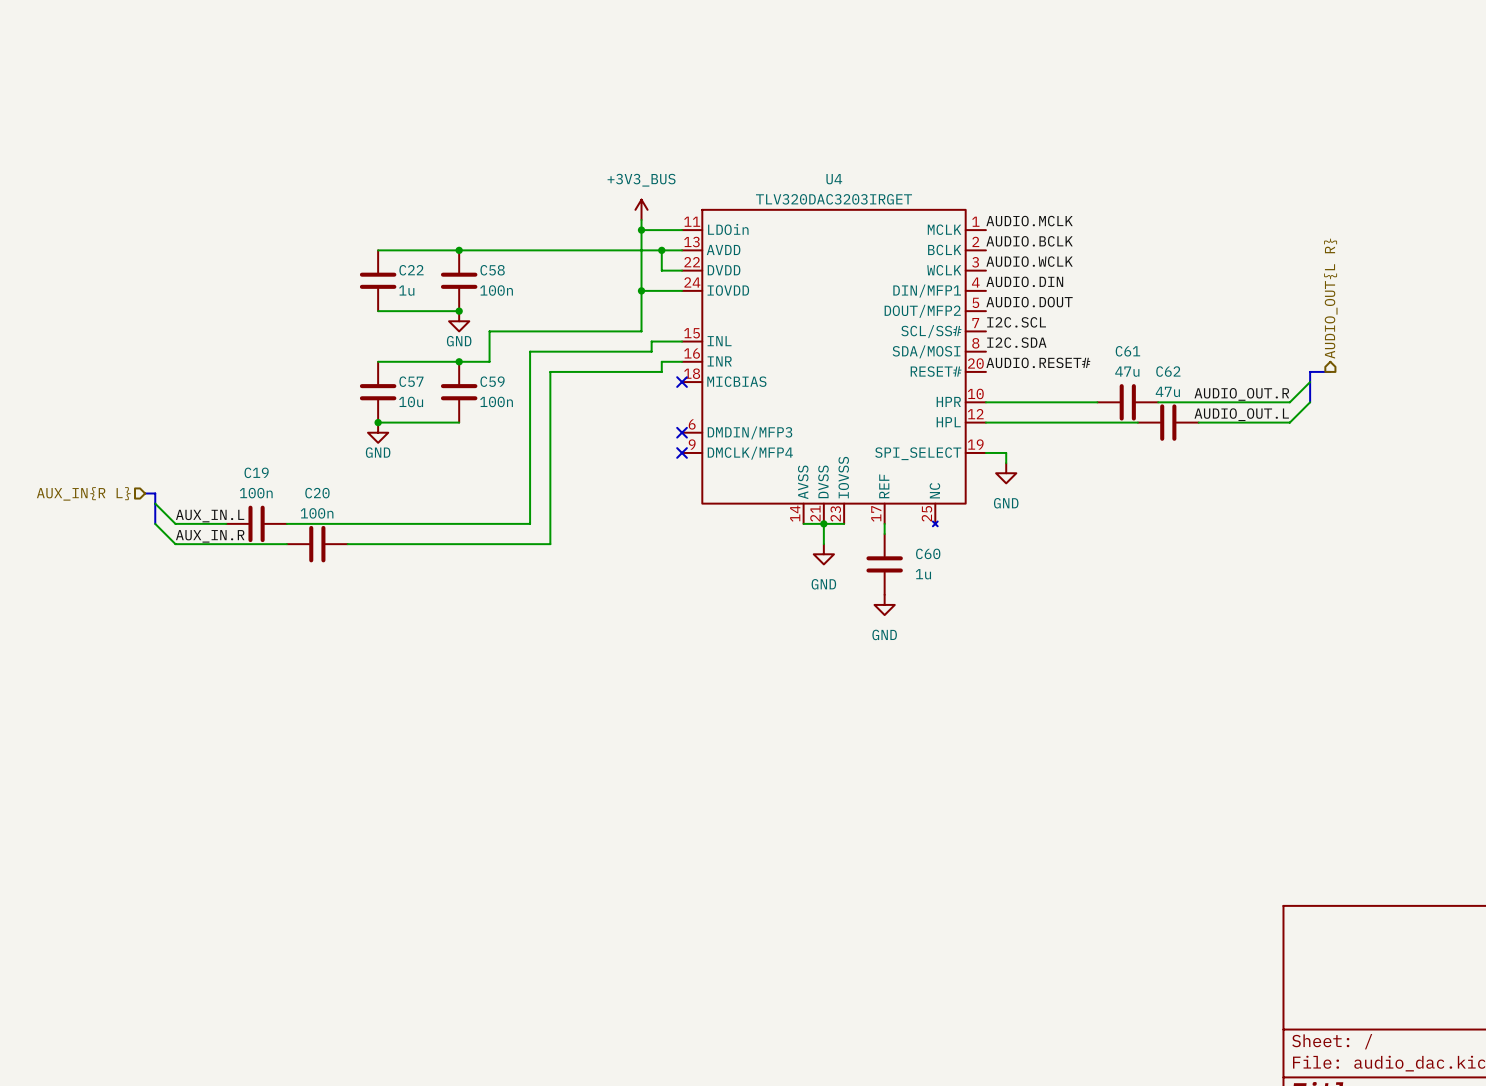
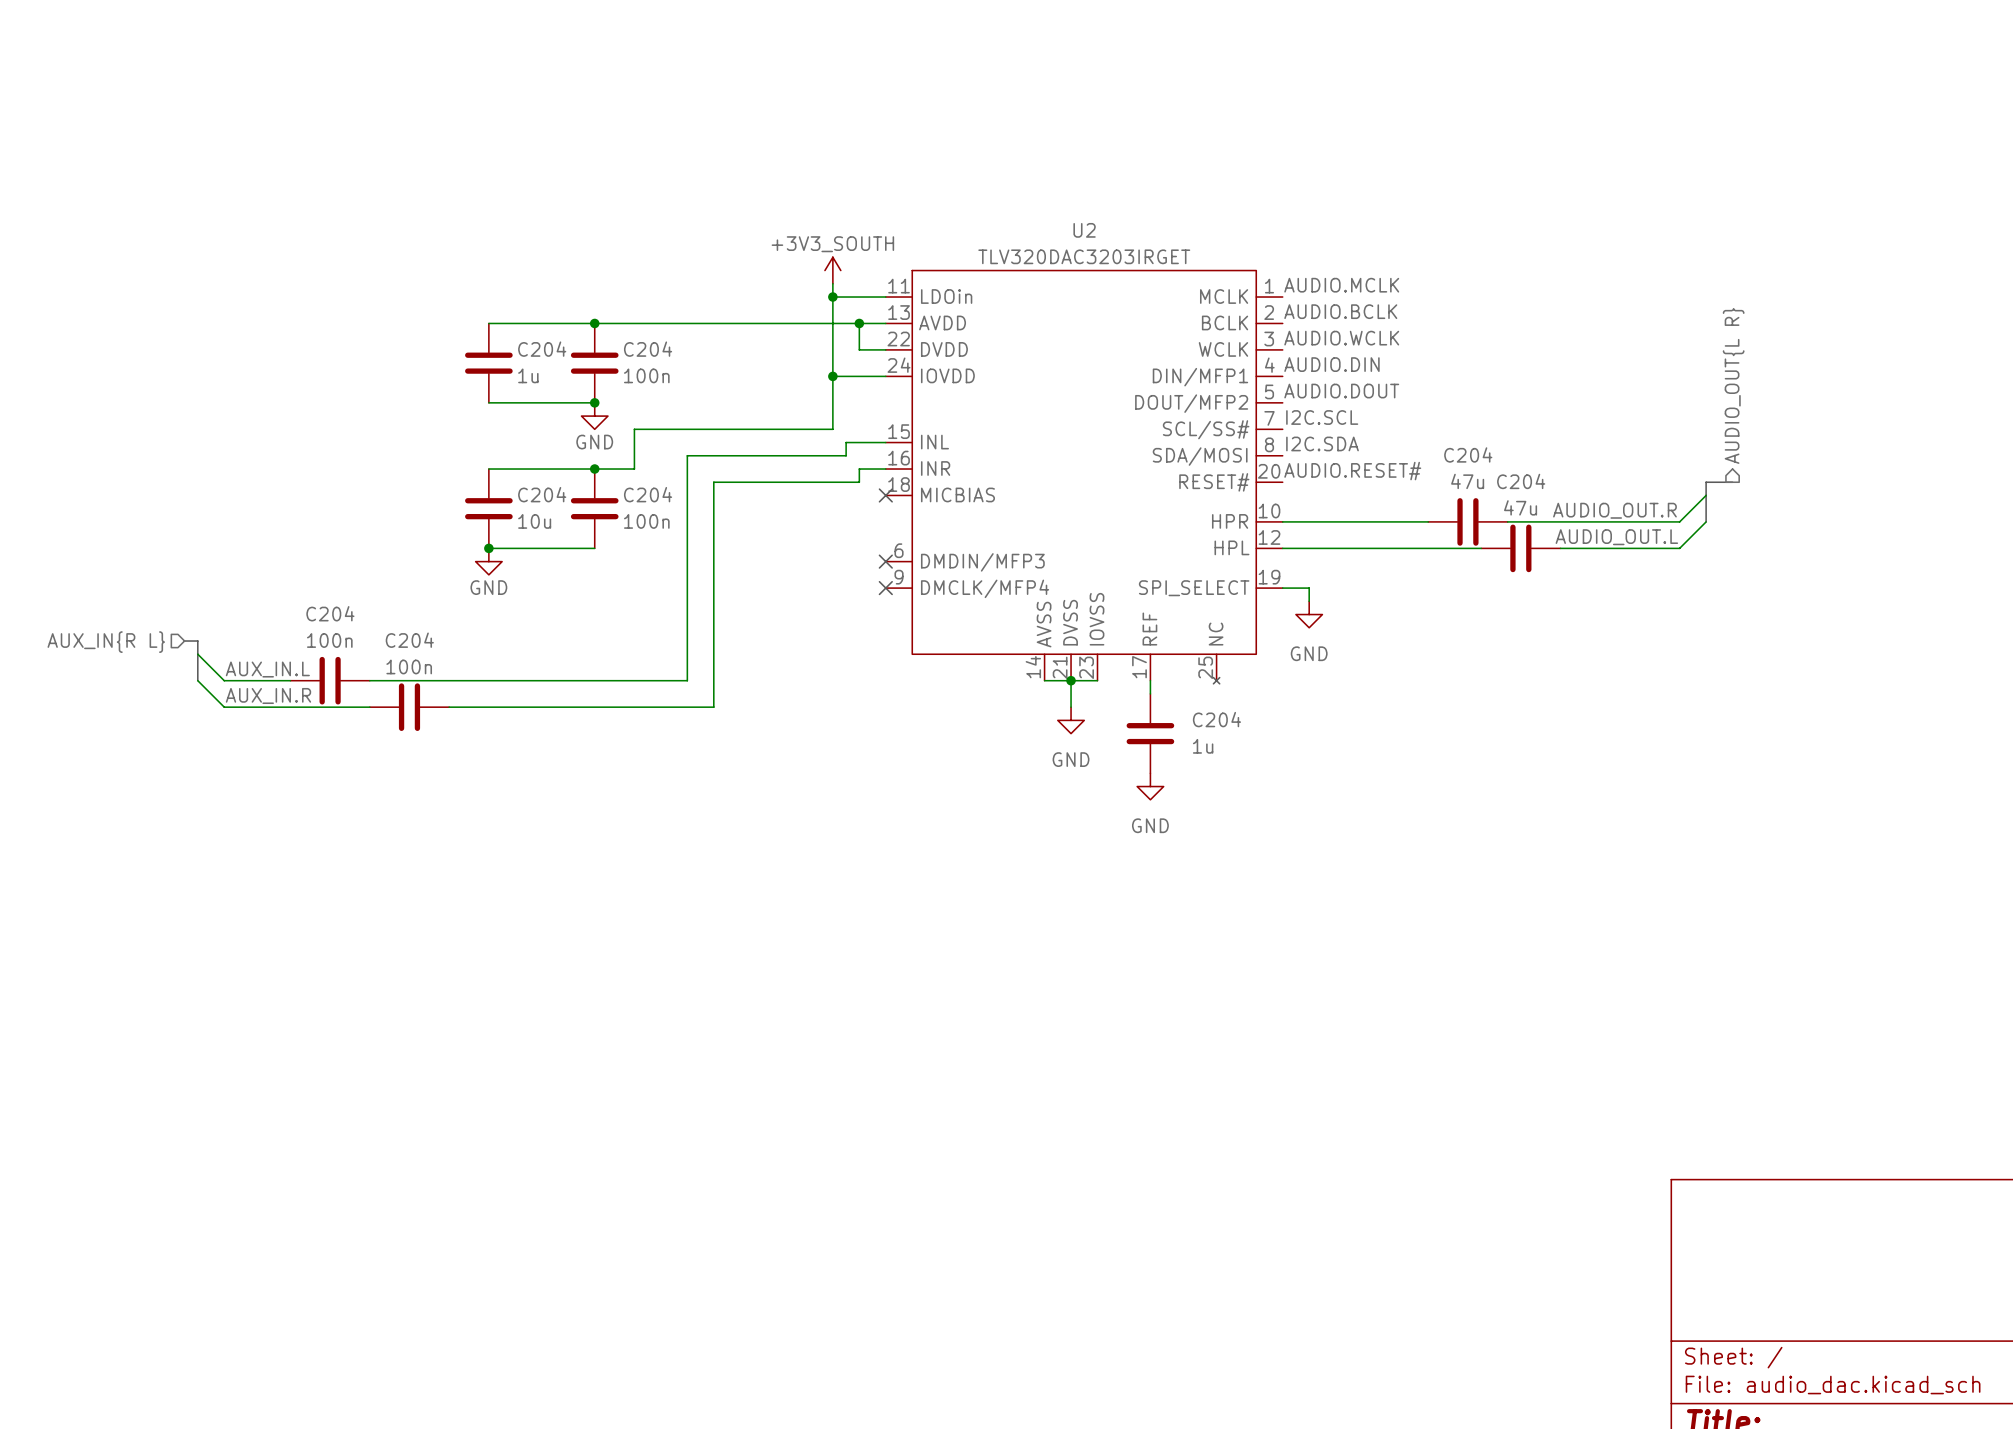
U4 name: U4 (834, 179) -> U2 (1084, 230)
power symbol: +3V3_BUS (641, 209) -> +3V3_SOUTH (832, 270)
C22 name: C22 (411, 270) -> C204 (542, 349)
C58 name: C58 (492, 270) -> C204 (648, 349)
C61 name: C61 (1127, 351) -> C204 (1468, 454)
C62 name: C62 (1168, 371) -> C204 (1521, 481)
C57 name: C57 (411, 381) -> C204 (542, 494)
C59 name: C59 (492, 381) -> C204 (648, 494)
C19 name: C19 (256, 472) -> C204 (330, 613)
C20 name: C20 (317, 493) -> C204 (409, 640)
C60 name: C60 (928, 553) -> C204 (1216, 719)

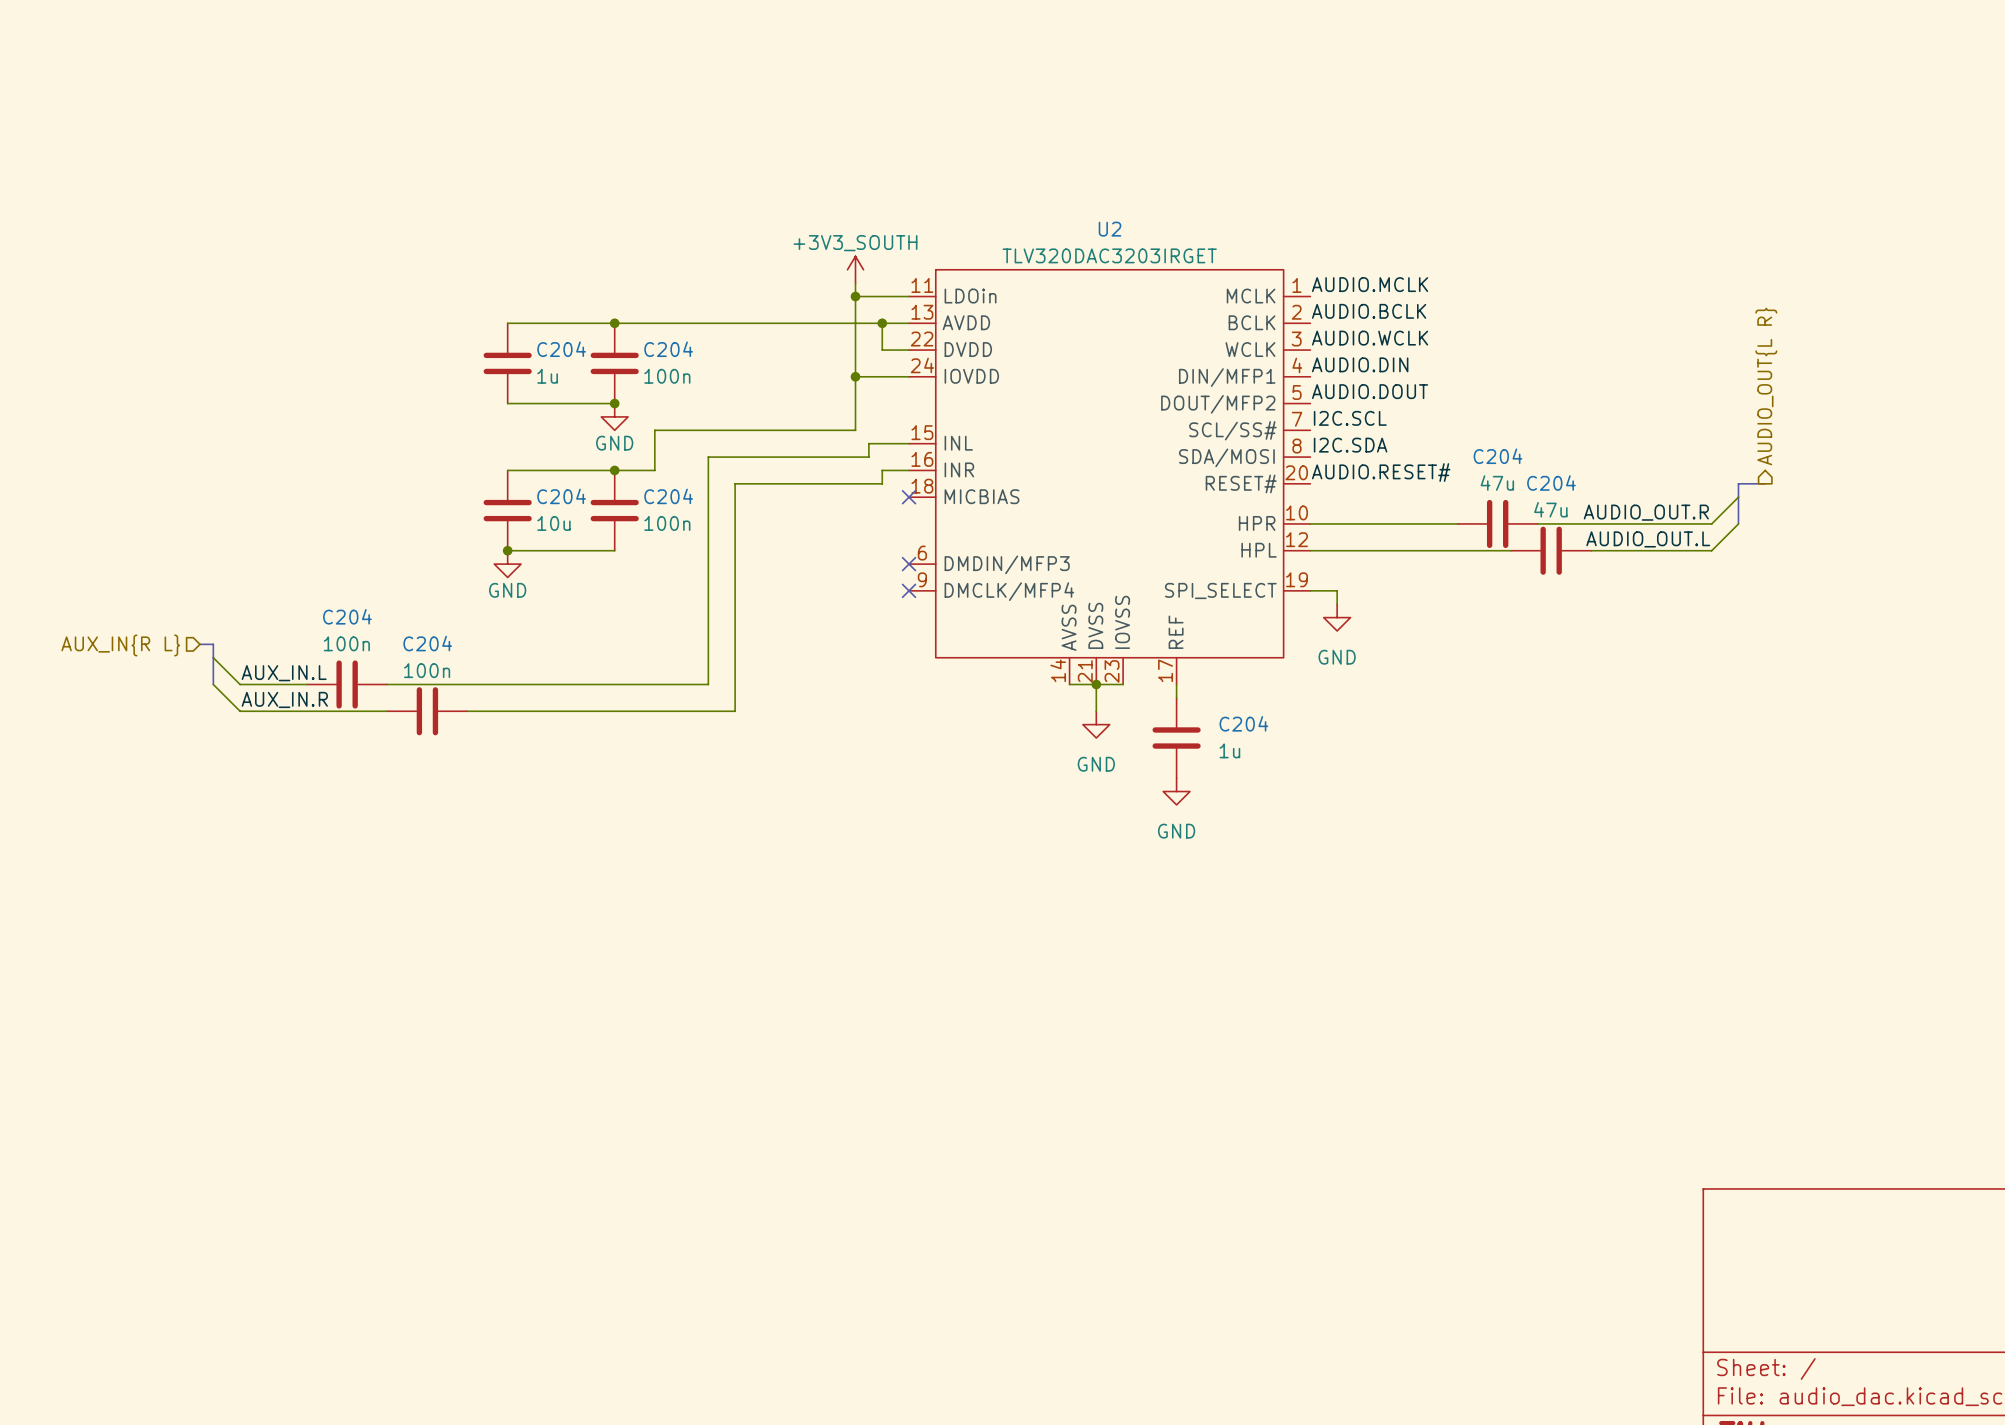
U2 symbol: [885, 270, 1283, 684] -> [909, 269, 1311, 685]

